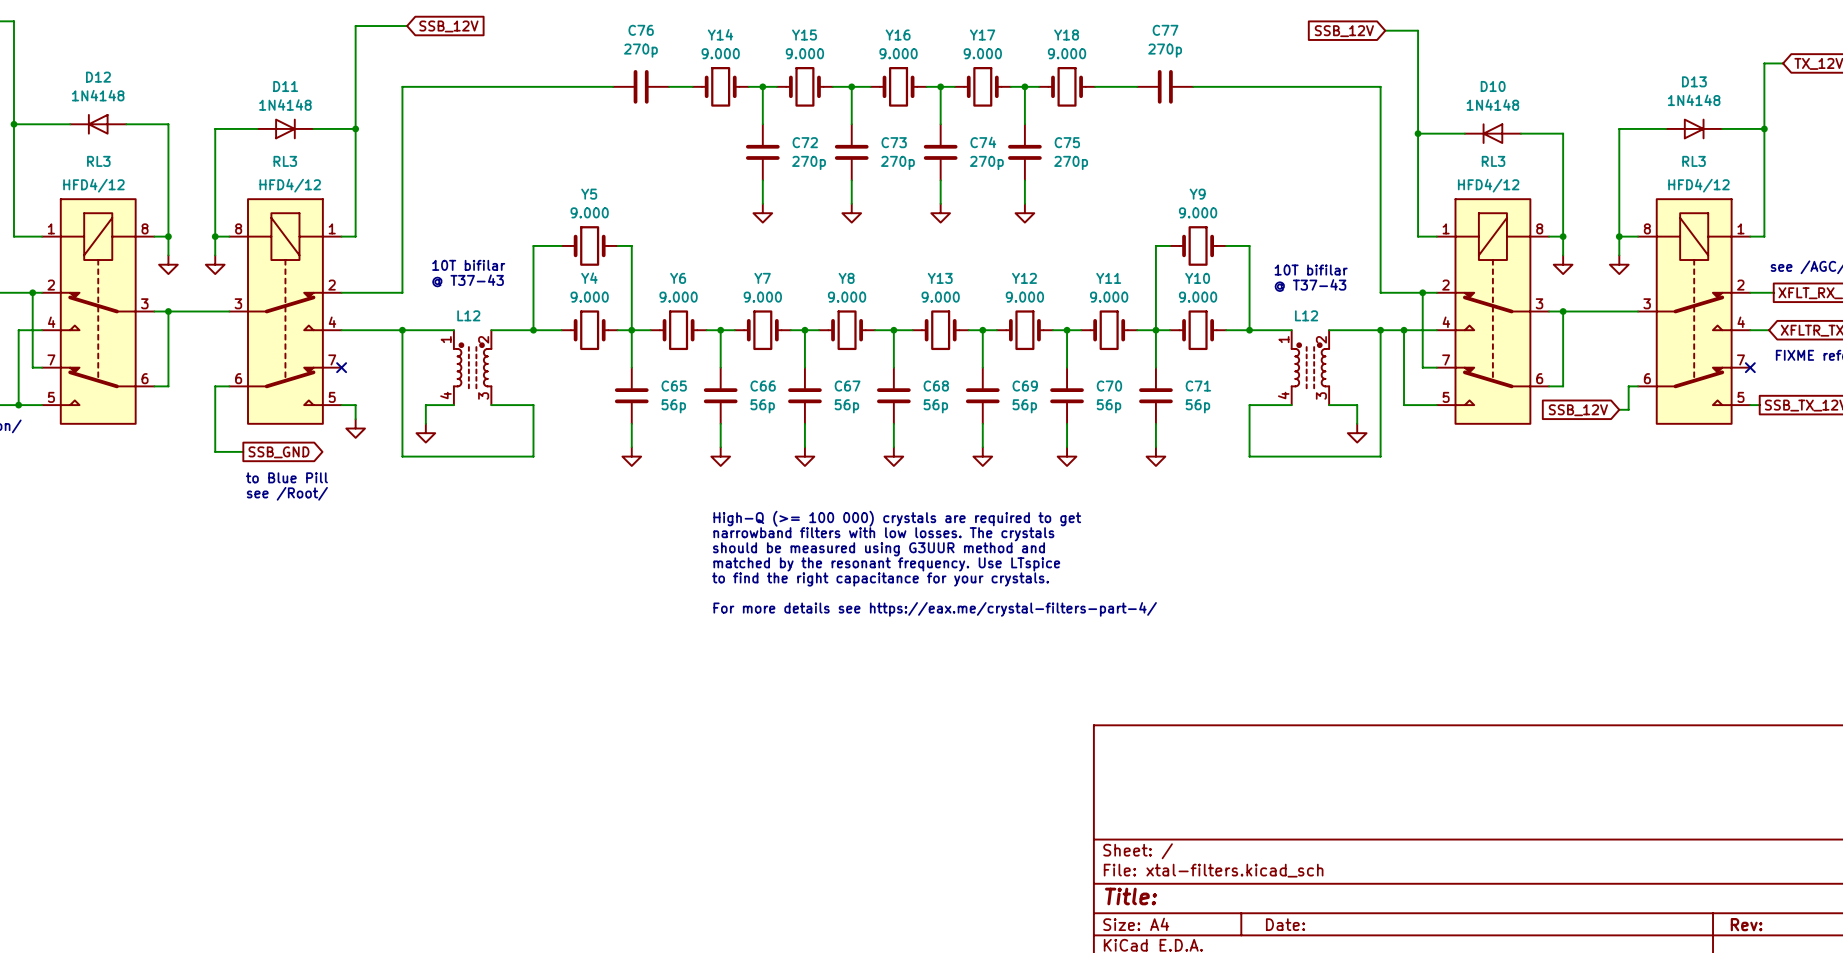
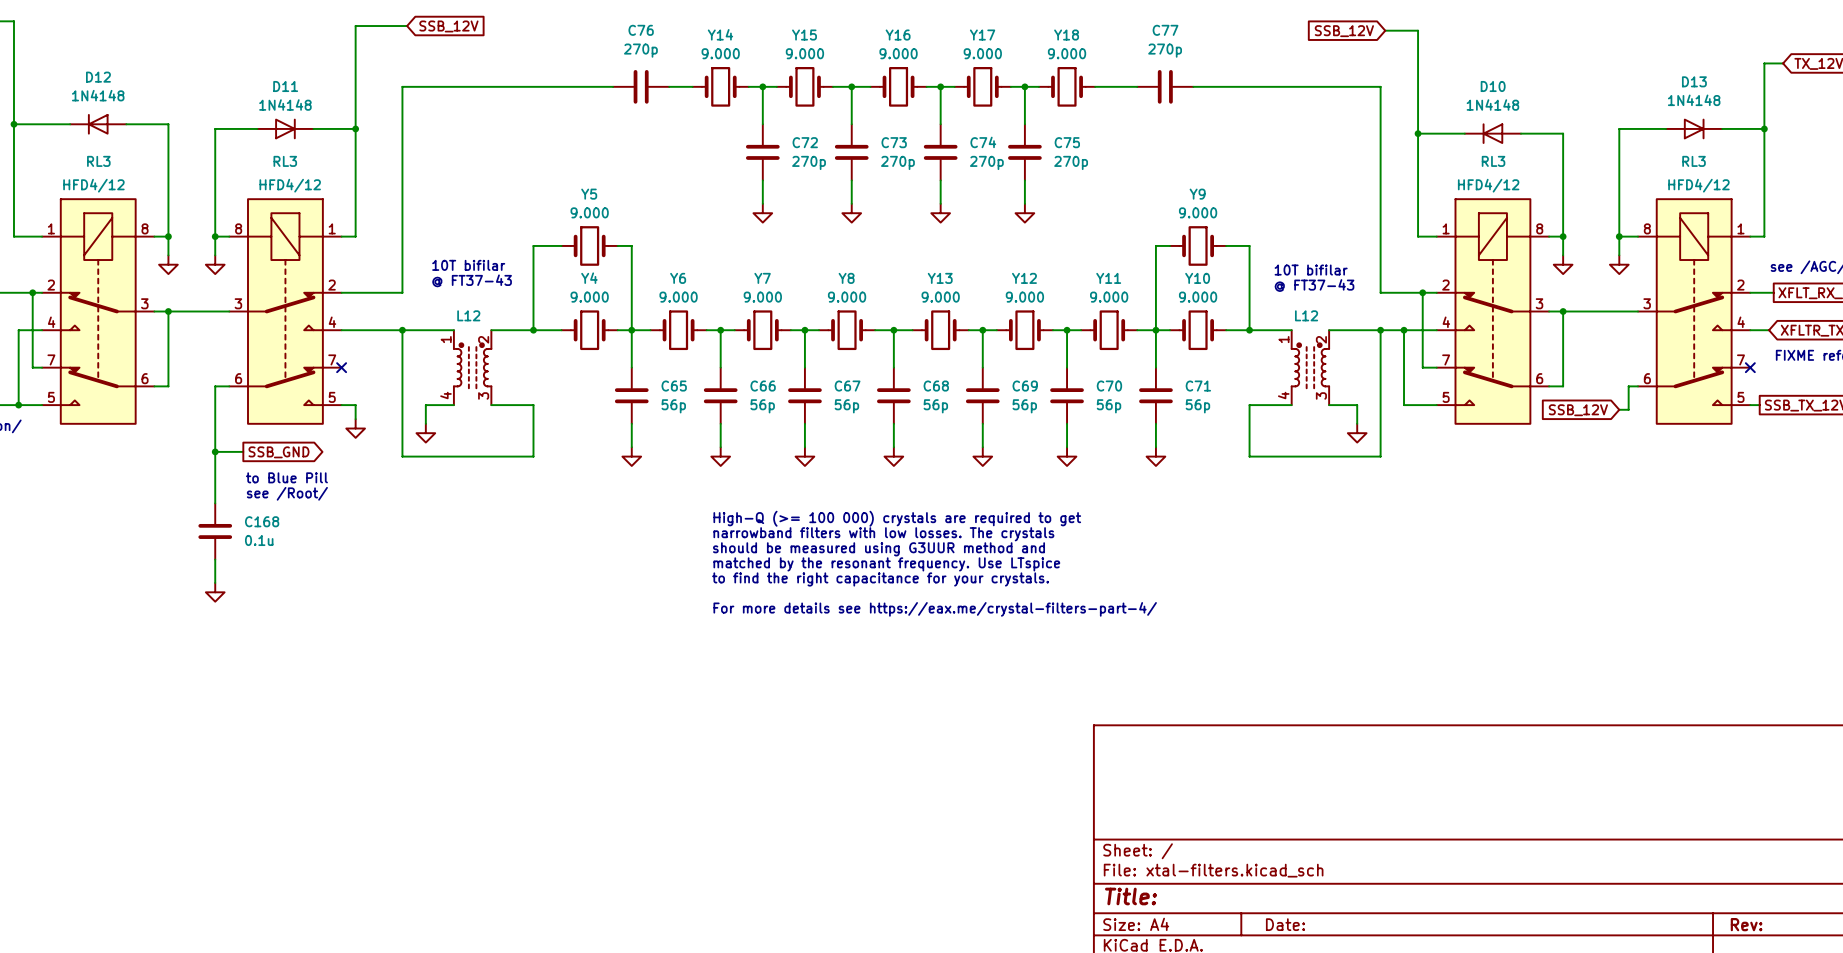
text: @ T37-43 (468, 280) -> @ FT37-43 (472, 280)
text: @ T37-43 (1310, 285) -> @ FT37-43 (1314, 285)
wire: none -> (215, 451) (215, 503)
junction: none -> (215, 451)
C168: none -> 0.1u (215, 531)
wire: none -> (215, 559) (215, 582)
power symbol: none -> (215, 592)

